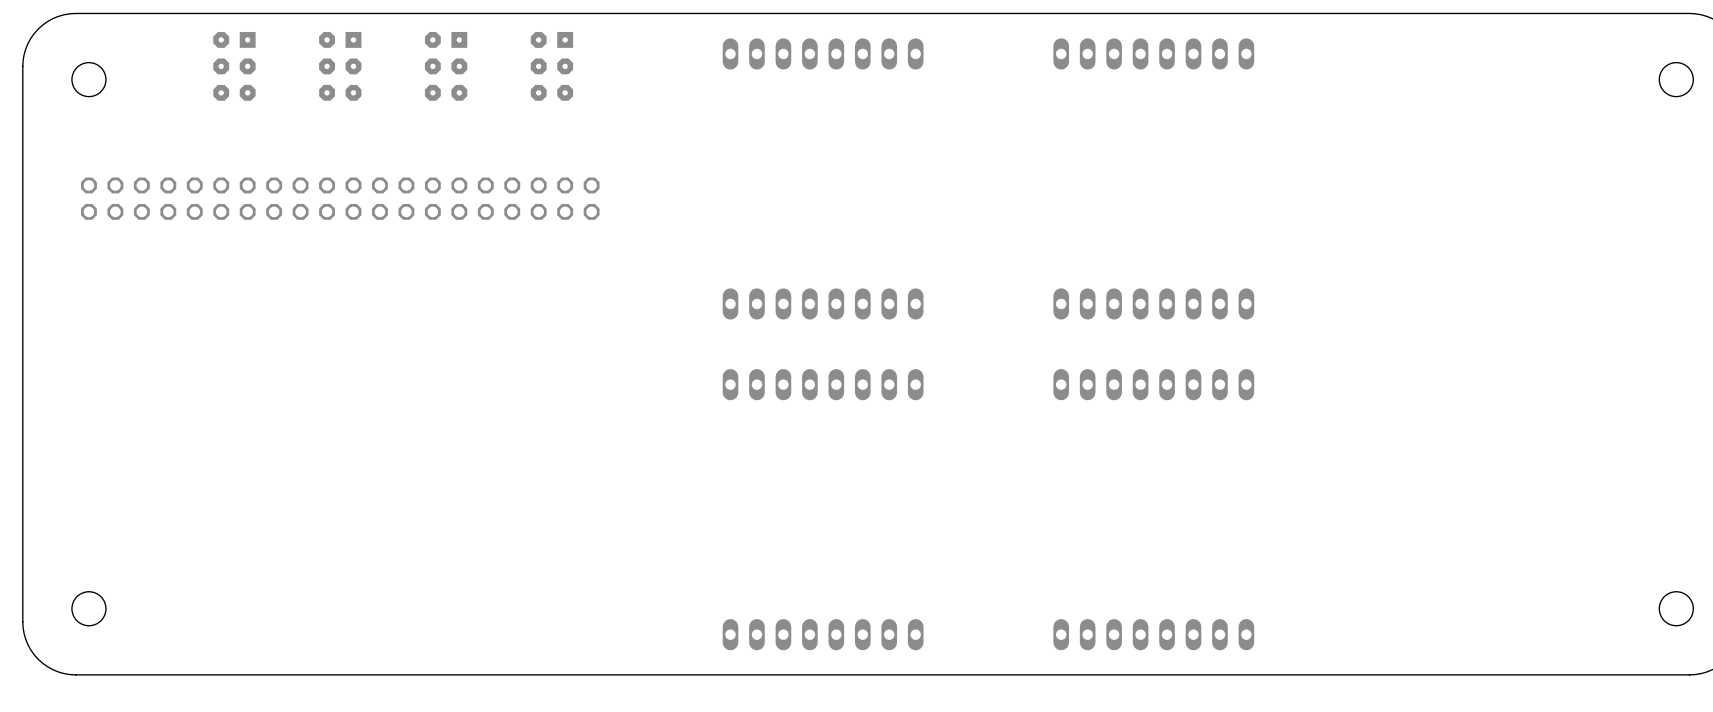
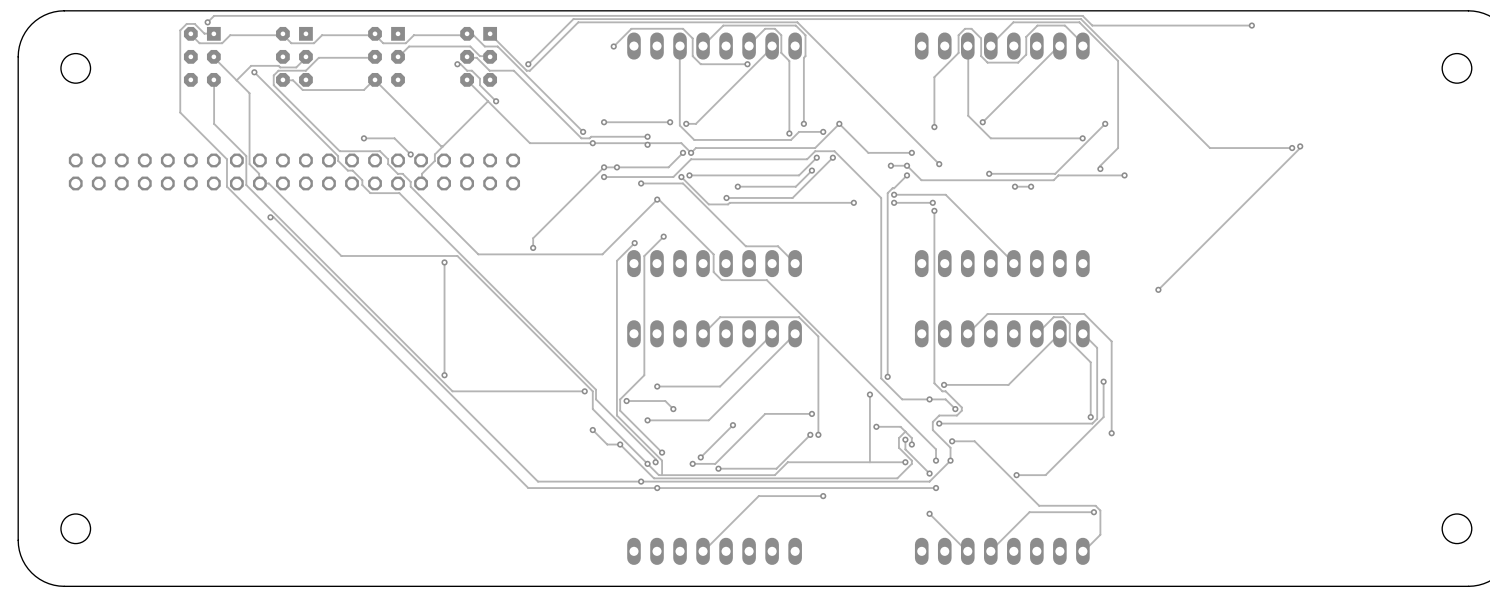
track: none -> (207, 22) (214, 15) (1082, 15) (1092, 25) (1251, 25)
via: none -> (207, 22)
via: none -> (1251, 25)
track: none -> (190, 33) (199, 43) (222, 43) (230, 35) (282, 33) (291, 43) (314, 43) (322, 35) (375, 33) (383, 43) (405, 43) (413, 35) (473, 35) (484, 46) (497, 46) (583, 131)
track: none -> (213, 33) (204, 33) (194, 23) (186, 23) (180, 30) (180, 112) (226, 159) (226, 186) (528, 488) (936, 488)
track: none -> (490, 33) (526, 70) (529, 70) (578, 22) (797, 22) (939, 164)
track: none -> (680, 46) (679, 125) (694, 139) (790, 139) (799, 131) (823, 131)
track: none -> (703, 46) (723, 25) (795, 25) (805, 35) (803, 123)
track: none -> (749, 46) (765, 28) (774, 28) (781, 35) (781, 52) (789, 61) (789, 133)
track: none -> (772, 46) (695, 123) (686, 123)
track: none -> (967, 46) (968, 115) (990, 138) (1082, 138)
track: none -> (990, 46) (1013, 22) (1079, 22) (1118, 61) (1118, 148) (1100, 165) (1100, 168)
track: none -> (1059, 46) (982, 122)
track: none -> (1082, 46) (1084, 44) (1064, 25) (1037, 25) (1026, 36) (1026, 54) (1018, 62) (987, 62) (981, 56) (981, 38) (971, 28) (965, 28) (958, 35) (958, 52) (934, 77) (934, 127)
track: none -> (613, 46) (631, 28) (683, 28) (692, 38) (692, 56) (700, 64) (747, 64)
via: none -> (613, 46)
track: none -> (213, 56) (249, 93) (249, 164) (259, 173) (259, 183) (268, 183) (341, 255) (457, 255) (592, 391) (592, 409) (658, 475) (774, 475) (787, 462) (905, 462)
track: none -> (305, 56) (296, 67) (251, 65) (236, 80)
track: none -> (375, 56) (318, 57) (305, 70) (278, 70) (273, 75) (273, 85) (339, 151) (380, 151) (388, 159) (388, 164) (397, 173) (402, 173) (410, 181) (410, 186) (478, 254) (602, 254) (658, 199) (713, 254) (713, 272) (721, 280) (766, 280) (936, 449) (936, 460)
track: none -> (467, 56) (476, 57) (489, 70) (513, 70) (581, 138) (647, 136)
track: none -> (490, 56) (479, 56) (470, 46) (409, 46) (398, 56)
track: none -> (457, 64) (460, 64) (467, 70) (471, 70) (479, 78) (479, 85) (496, 101)
via: none -> (457, 64)
track: none -> (528, 64) (573, 19) (1081, 19) (1209, 148) (1292, 148)
via: none -> (528, 64)
via: none -> (747, 64)
track: none -> (254, 72) (338, 156) (338, 160) (347, 170) (352, 170) (362, 180) (362, 185) (370, 193) (399, 193) (596, 389) (596, 399) (655, 459) (655, 462)
via: none -> (254, 72)
track: none -> (213, 79) (214, 123) (246, 156) (246, 185) (452, 391) (584, 391)
track: none -> (282, 79) (293, 80) (302, 90) (363, 90) (375, 79) (442, 146)
track: none -> (467, 79) (529, 143) (681, 143) (691, 152) (695, 148) (815, 148) (839, 123) (868, 152) (911, 152)
track: none -> (488, 101) (434, 154) (434, 160) (421, 173) (421, 183)
via: none -> (496, 101)
via: none -> (604, 122)
track: none -> (670, 122) (604, 122)
via: none -> (670, 122)
via: none -> (982, 122)
via: none -> (686, 123)
via: none -> (803, 123)
via: none -> (839, 123)
track: none -> (1105, 123) (1055, 173) (989, 173)
via: none -> (1105, 123)
via: none -> (934, 127)
via: none -> (583, 131)
via: none -> (823, 131)
via: none -> (789, 133)
via: none -> (647, 136)
track: none -> (363, 138) (394, 138) (410, 154)
via: none -> (363, 138)
via: none -> (1082, 138)
via: none -> (592, 143)
via: none -> (647, 144)
track: none -> (1300, 146) (1158, 289)
via: none -> (1300, 146)
via: none -> (1292, 148)
track: none -> (683, 152) (668, 167) (604, 167) (533, 238) (533, 247)
via: none -> (683, 152)
via: none -> (691, 152)
via: none -> (911, 152)
via: none -> (410, 154)
track: none -> (816, 157) (799, 175) (689, 175)
via: none -> (816, 157)
track: none -> (832, 157) (792, 197) (726, 197)
via: none -> (832, 157)
via: none -> (939, 164)
track: none -> (890, 165) (907, 165) (921, 180) (1053, 180) (1058, 175) (1124, 175)
via: none -> (890, 165)
via: none -> (907, 165)
via: none -> (604, 167)
via: none -> (616, 167)
via: none -> (1100, 168)
track: none -> (811, 170) (795, 186) (737, 186)
via: none -> (811, 170)
via: none -> (989, 173)
via: none -> (689, 175)
track: none -> (907, 175) (887, 193) (887, 376)
via: none -> (907, 175)
via: none -> (1124, 175)
track: none -> (604, 177) (673, 177) (691, 159) (807, 159) (815, 151) (834, 151) (881, 197) (881, 378) (902, 399) (945, 399) (955, 409)
via: none -> (604, 177)
track: none -> (681, 177) (708, 204) (853, 202)
via: none -> (681, 177)
track: none -> (641, 183) (683, 183) (745, 246) (778, 246) (795, 263)
via: none -> (641, 183)
via: none -> (737, 186)
via: none -> (1014, 186)
track: none -> (1031, 186) (1014, 186)
via: none -> (1031, 186)
track: none -> (894, 194) (945, 194) (1013, 263)
via: none -> (894, 194)
via: none -> (726, 197)
via: none -> (657, 199)
via: none -> (853, 202)
via: none -> (894, 202)
track: none -> (932, 202) (894, 202)
via: none -> (932, 202)
track: none -> (934, 210) (934, 383) (961, 407) (961, 410) (956, 415) (939, 415) (932, 421) (932, 430) (950, 447) (950, 460) (929, 481) (537, 481) (273, 217) (270, 217)
via: none -> (934, 210)
via: none -> (270, 217)
track: none -> (663, 236) (644, 255) (644, 375) (620, 399) (620, 410) (662, 452)
via: none -> (663, 236)
track: none -> (634, 243) (616, 260) (616, 415) (662, 460) (662, 475)
via: none -> (634, 243)
via: none -> (533, 247)
track: none -> (444, 262) (444, 375)
via: none -> (444, 262)
via: none -> (1158, 289)
track: none -> (703, 333) (720, 317) (799, 317) (818, 336) (818, 434)
track: none -> (772, 333) (720, 386) (657, 386)
track: none -> (795, 333) (708, 420) (647, 420)
track: none -> (967, 333) (987, 314) (1084, 314) (1111, 341) (1111, 433)
track: none -> (1036, 333) (1053, 317) (1063, 317) (1069, 323) (1069, 341) (1090, 362) (1090, 417)
track: none -> (1059, 333) (1008, 384) (944, 384)
track: none -> (1082, 333) (1097, 347) (1097, 418) (1092, 423) (939, 423)
via: none -> (444, 375)
via: none -> (887, 376)
track: none -> (1103, 381) (1103, 417) (1045, 475) (1016, 475)
via: none -> (1103, 381)
via: none -> (944, 384)
via: none -> (657, 386)
via: none -> (584, 391)
track: none -> (869, 394) (869, 462)
via: none -> (869, 394)
via: none -> (929, 399)
track: none -> (626, 401) (665, 401) (673, 409)
via: none -> (626, 401)
via: none -> (673, 409)
via: none -> (955, 409)
track: none -> (811, 413) (765, 413) (715, 463) (692, 463)
via: none -> (811, 413)
via: none -> (1090, 417)
via: none -> (647, 420)
via: none -> (939, 423)
track: none -> (732, 425) (700, 457)
via: none -> (732, 425)
track: none -> (876, 426) (900, 426) (911, 438) (911, 444)
via: none -> (876, 426)
track: none -> (592, 430) (607, 444) (620, 444) (654, 478) (897, 478) (911, 463) (911, 460) (898, 447) (898, 438) (905, 431)
via: none -> (592, 430)
via: none -> (1111, 433)
track: none -> (810, 434) (776, 468) (718, 468)
via: none -> (810, 434)
via: none -> (818, 434)
track: none -> (905, 439) (905, 449) (929, 473)
via: none -> (905, 439)
track: none -> (952, 441) (974, 441) (1039, 505) (1095, 505) (1100, 510) (1100, 534) (1082, 551)
via: none -> (952, 441)
via: none -> (620, 444)
via: none -> (911, 444)
via: none -> (662, 452)
via: none -> (700, 457)
via: none -> (936, 460)
via: none -> (950, 460)
via: none -> (655, 462)
via: none -> (905, 462)
via: none -> (647, 463)
via: none -> (692, 463)
via: none -> (718, 468)
via: none -> (929, 473)
via: none -> (1016, 475)
via: none -> (641, 481)
via: none -> (657, 488)
via: none -> (936, 488)
track: none -> (823, 496) (758, 496) (703, 551)
via: none -> (823, 496)
track: none -> (1093, 512) (1029, 512) (990, 551)
via: none -> (1093, 512)
track: none -> (929, 513) (967, 551)
via: none -> (929, 513)

